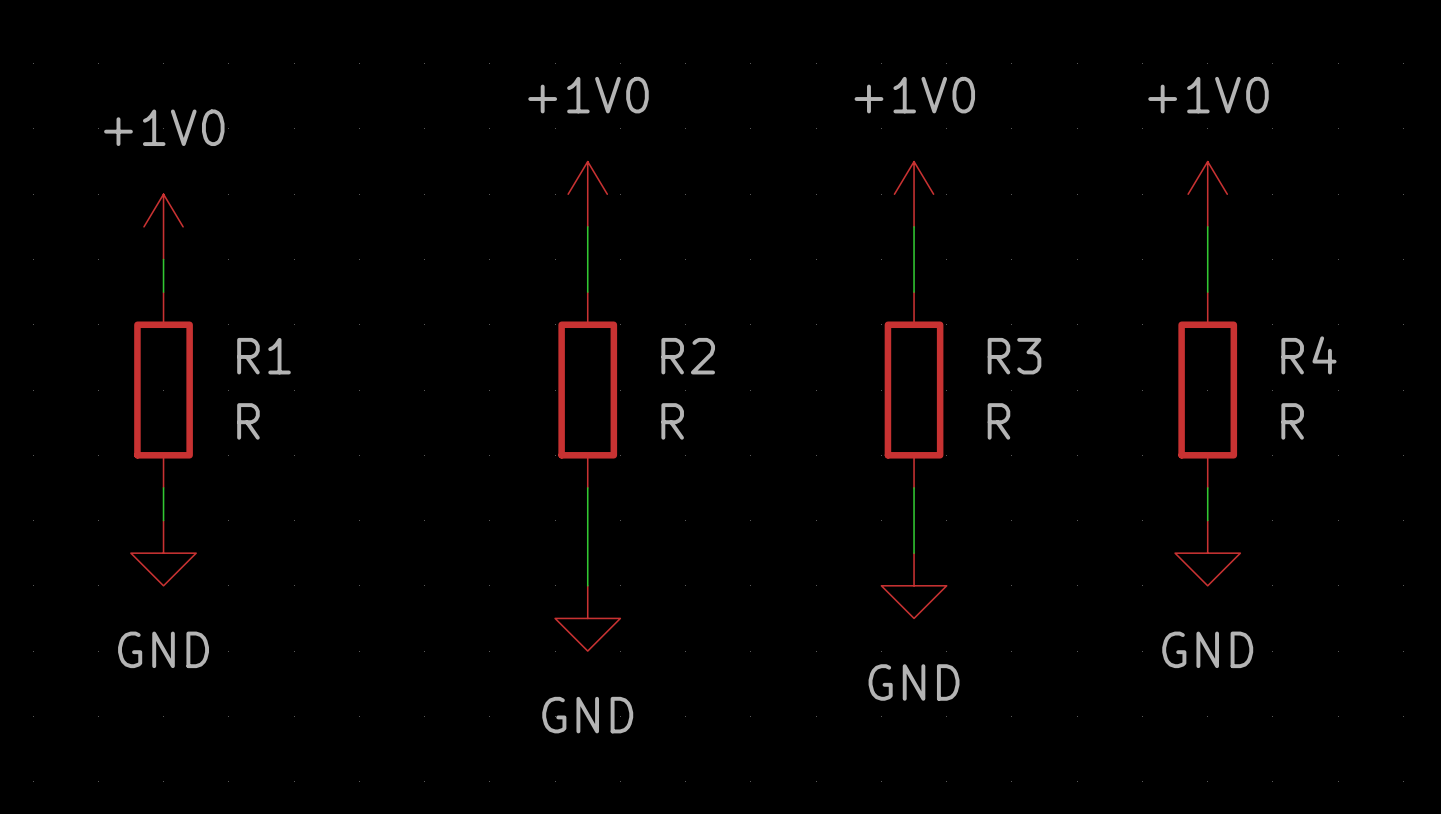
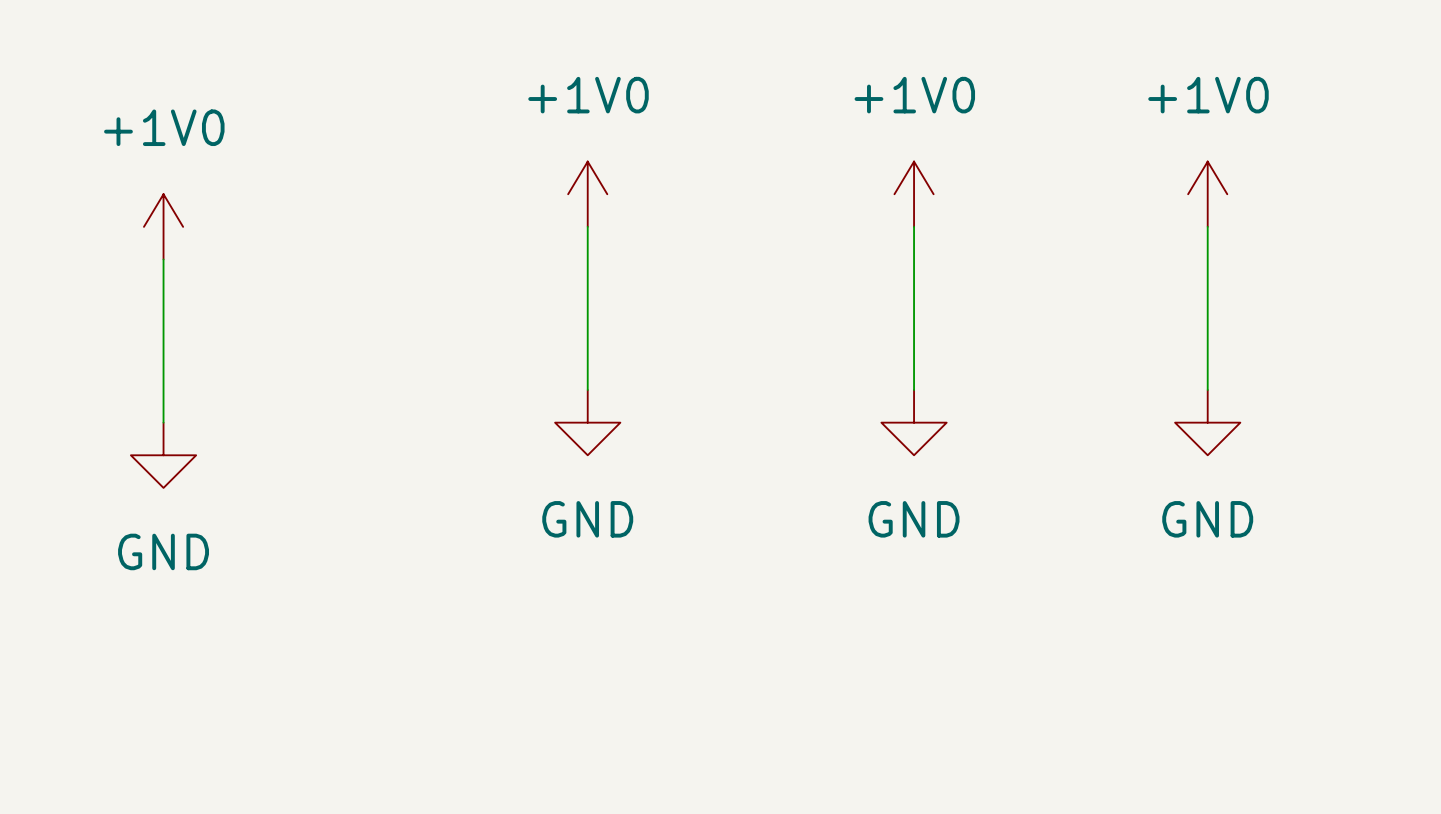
wire: none -> (163, 292) (163, 422)
wire: none -> (914, 292) (914, 390)
wire: none -> (1207, 292) (1207, 390)
R1: R (163, 390) -> none
R2: R (587, 390) -> none
R3: R (914, 390) -> none
R4: R (1207, 390) -> none
power symbol: none -> GND (587, 422)
power symbol: none -> GND (914, 422)
wire: (163, 487) (163, 520) -> none
wire: (587, 487) (587, 585) -> (587, 292) (587, 390)
wire: (914, 487) (914, 553) -> none
wire: (1207, 487) (1207, 520) -> none
power symbol position: GND (163, 553) -> GND (163, 455)
power symbol position: GND (1207, 553) -> GND (1207, 422)
power symbol: GND (914, 585) -> none
power symbol: GND (587, 618) -> none

